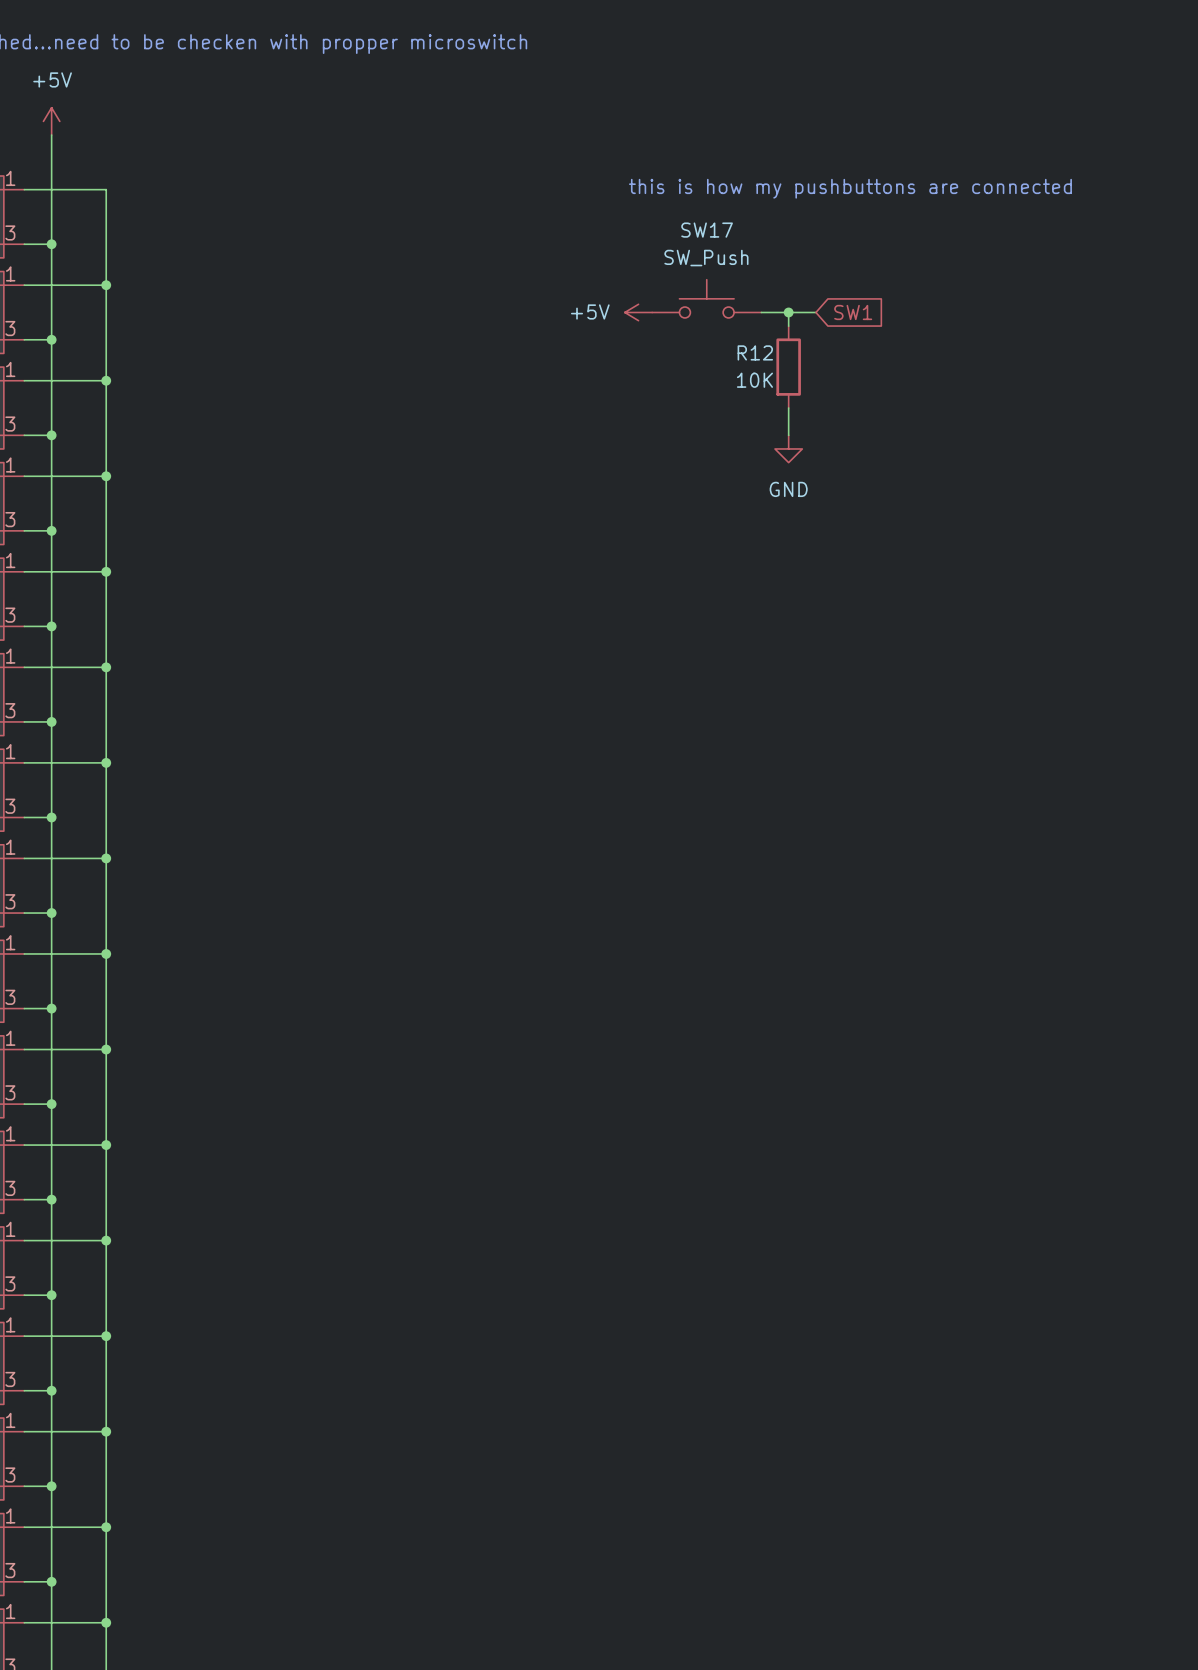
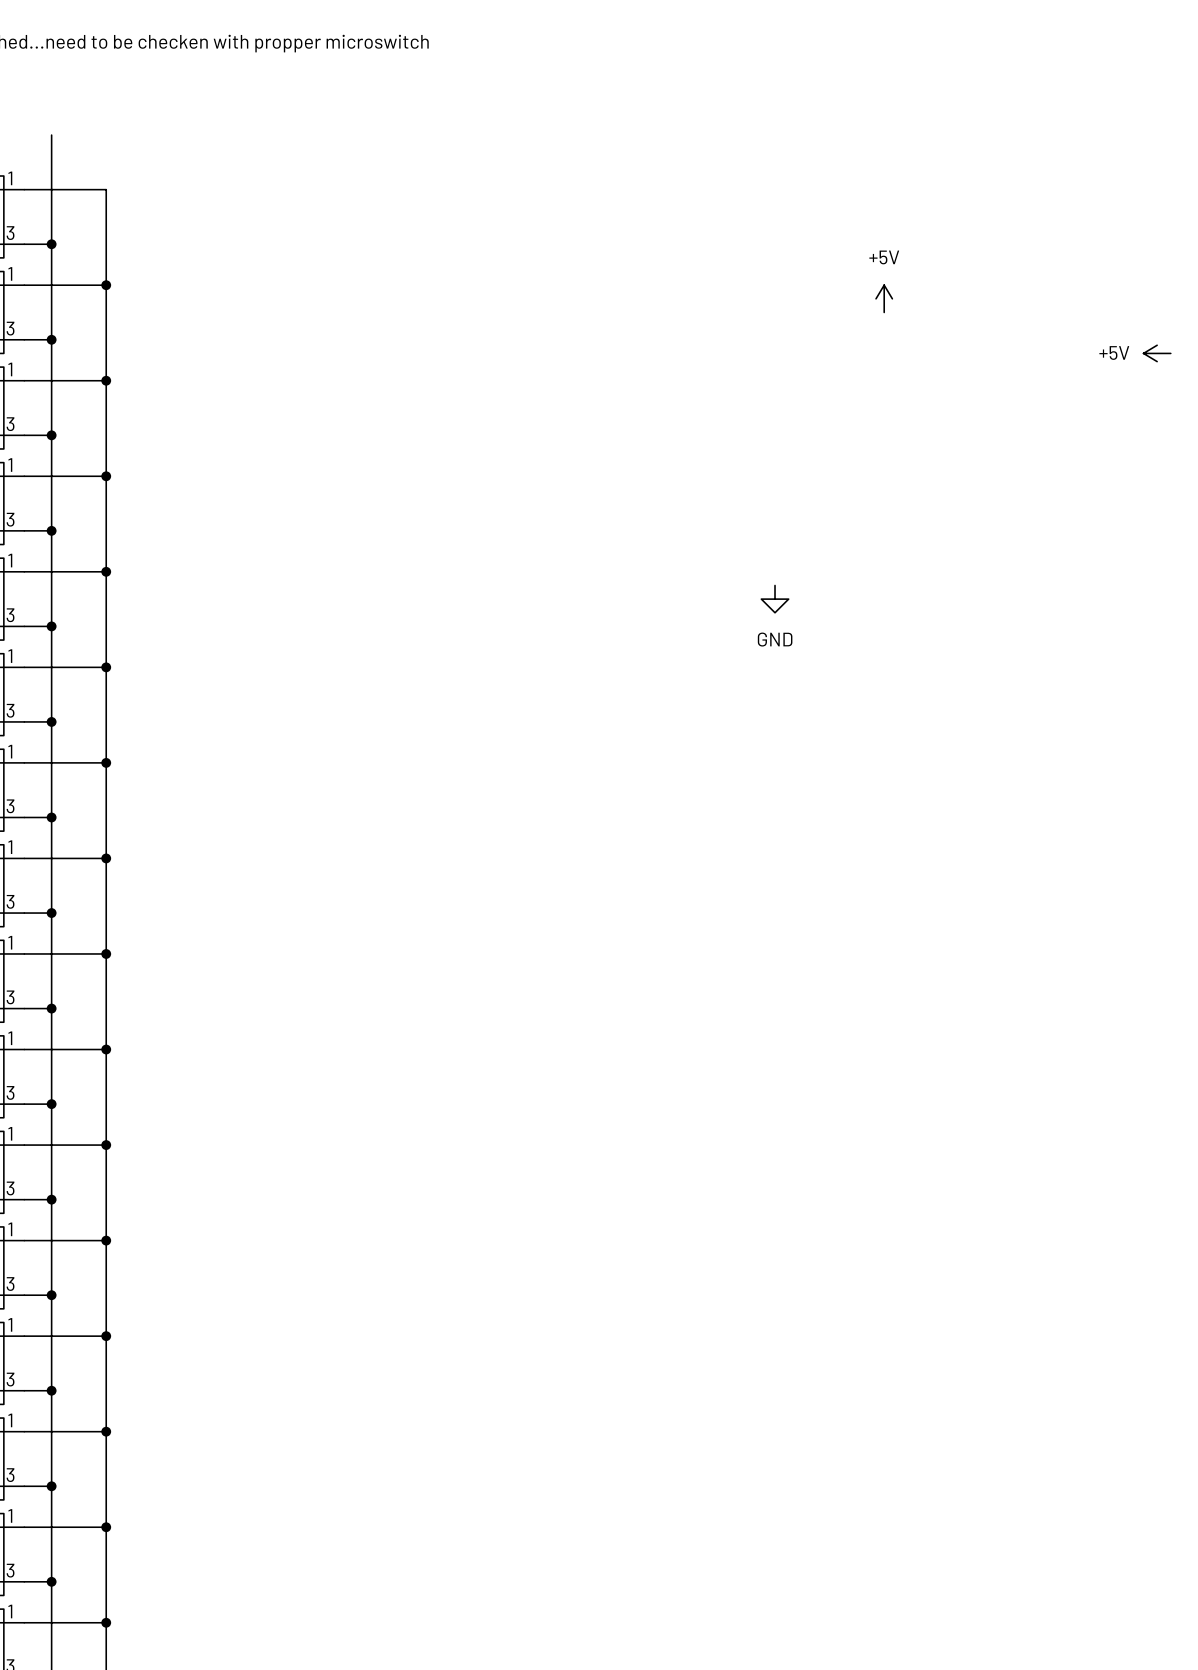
power symbol: +5V (51, 121) -> none
text: this is how my pushbuttons are connected (850, 188) -> none
SW17: SW_Push (706, 298) -> none
power symbol rotation: 0° (638, 312) -> 90° clockwise (884, 298)
power symbol position: +5V (638, 312) -> +5V (884, 298)
wire: (761, 312) (815, 312) -> none
wire: (788, 312) (788, 326) -> none
junction: (788, 312) -> none
global label: SW1 (853, 312) -> none
power symbol: none -> +5V (1157, 353)
R12: 10K (788, 367) -> none
wire: (788, 408) (788, 435) -> none
power symbol position: GND (788, 448) -> GND (775, 599)

